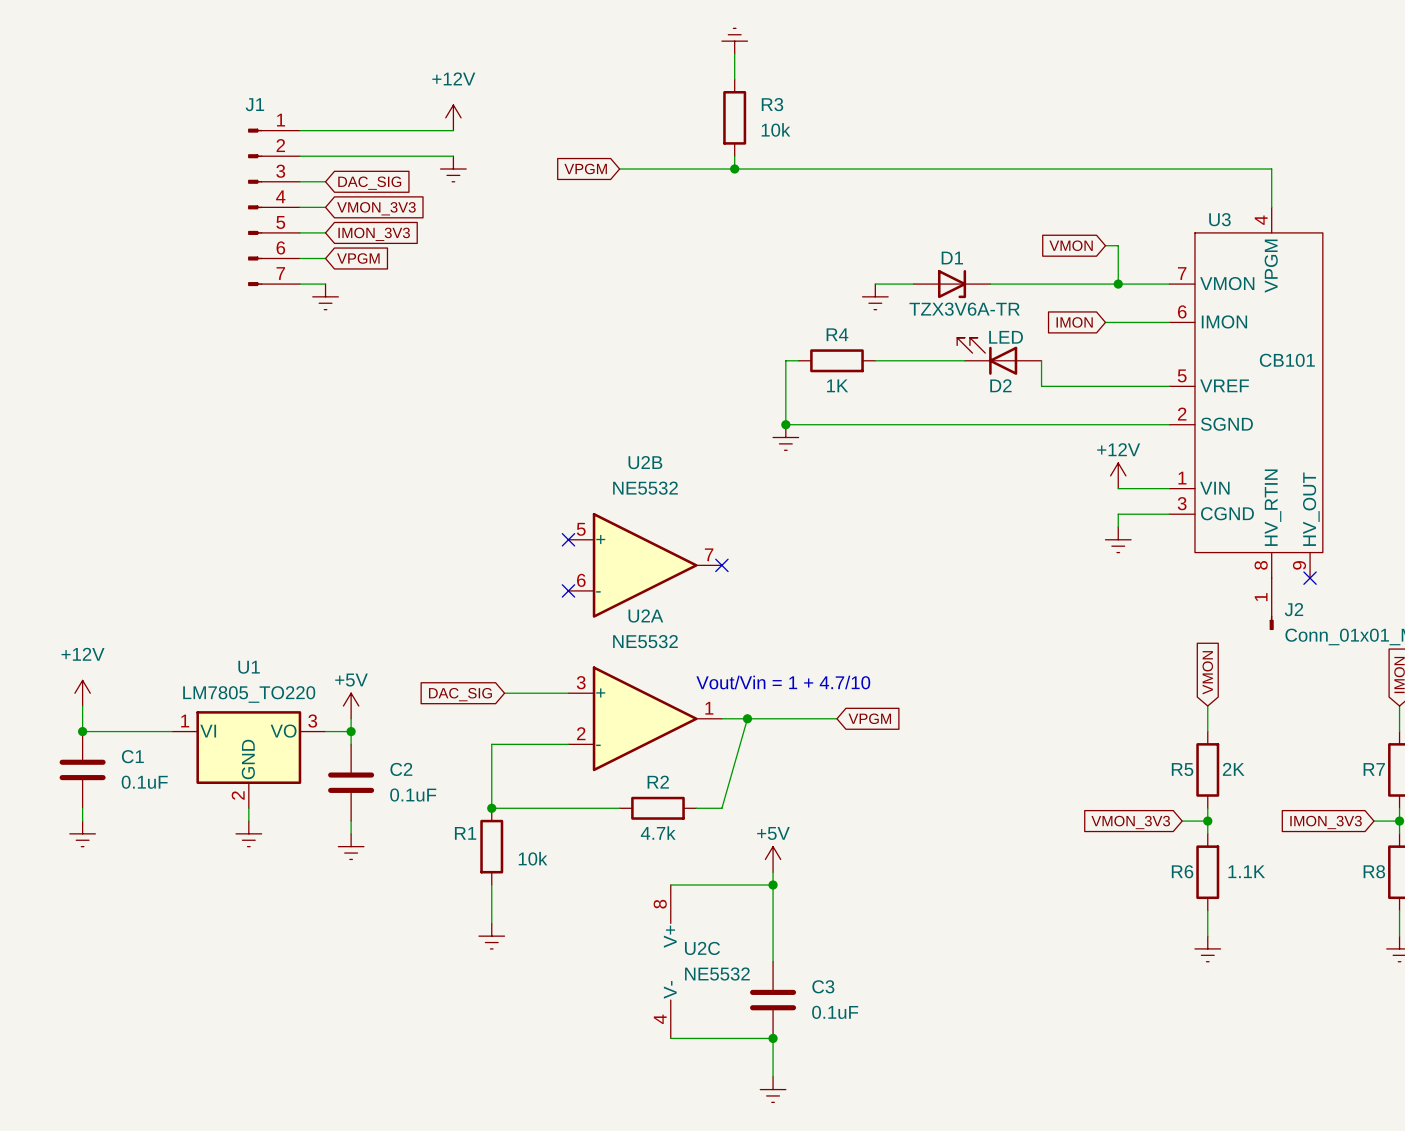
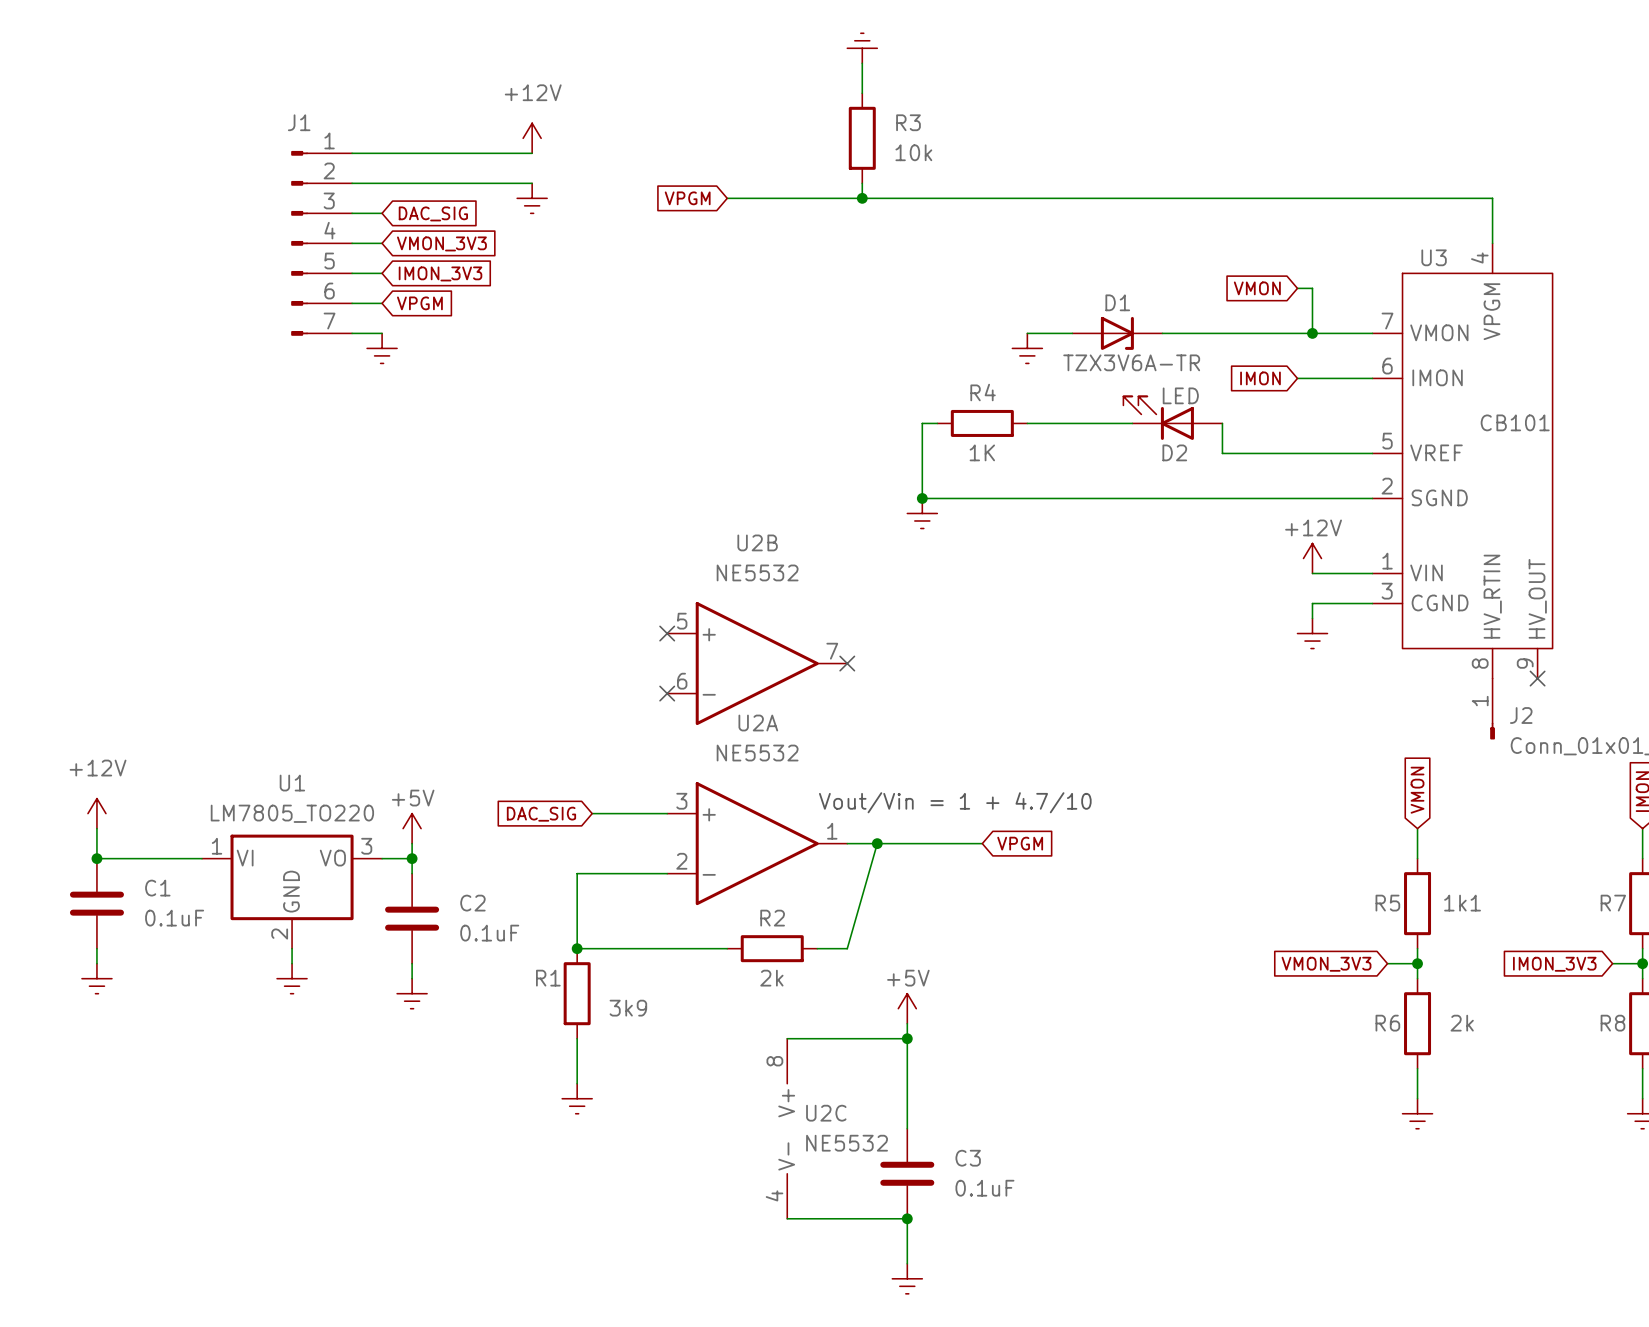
R5 value: 2K (1233, 769) -> 1k1 (1462, 903)
R2 value: 4.7k (658, 833) -> 2k (771, 978)
R1 value: 10k (533, 858) -> 3k9 (628, 1008)
R6 value: 1.1K (1246, 871) -> 2k (1462, 1023)

